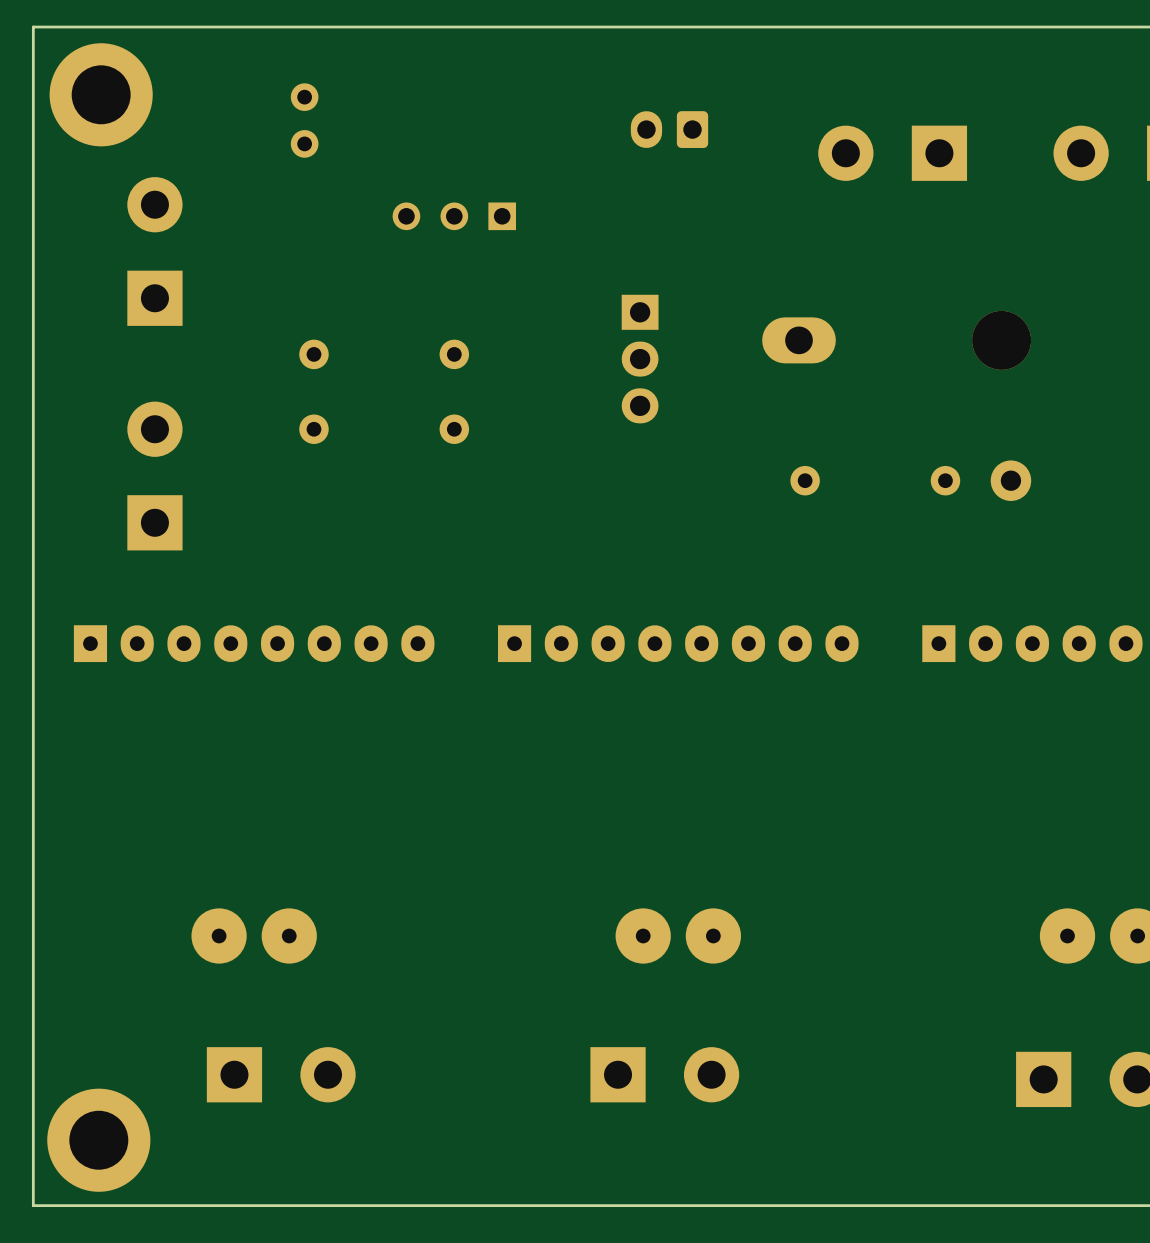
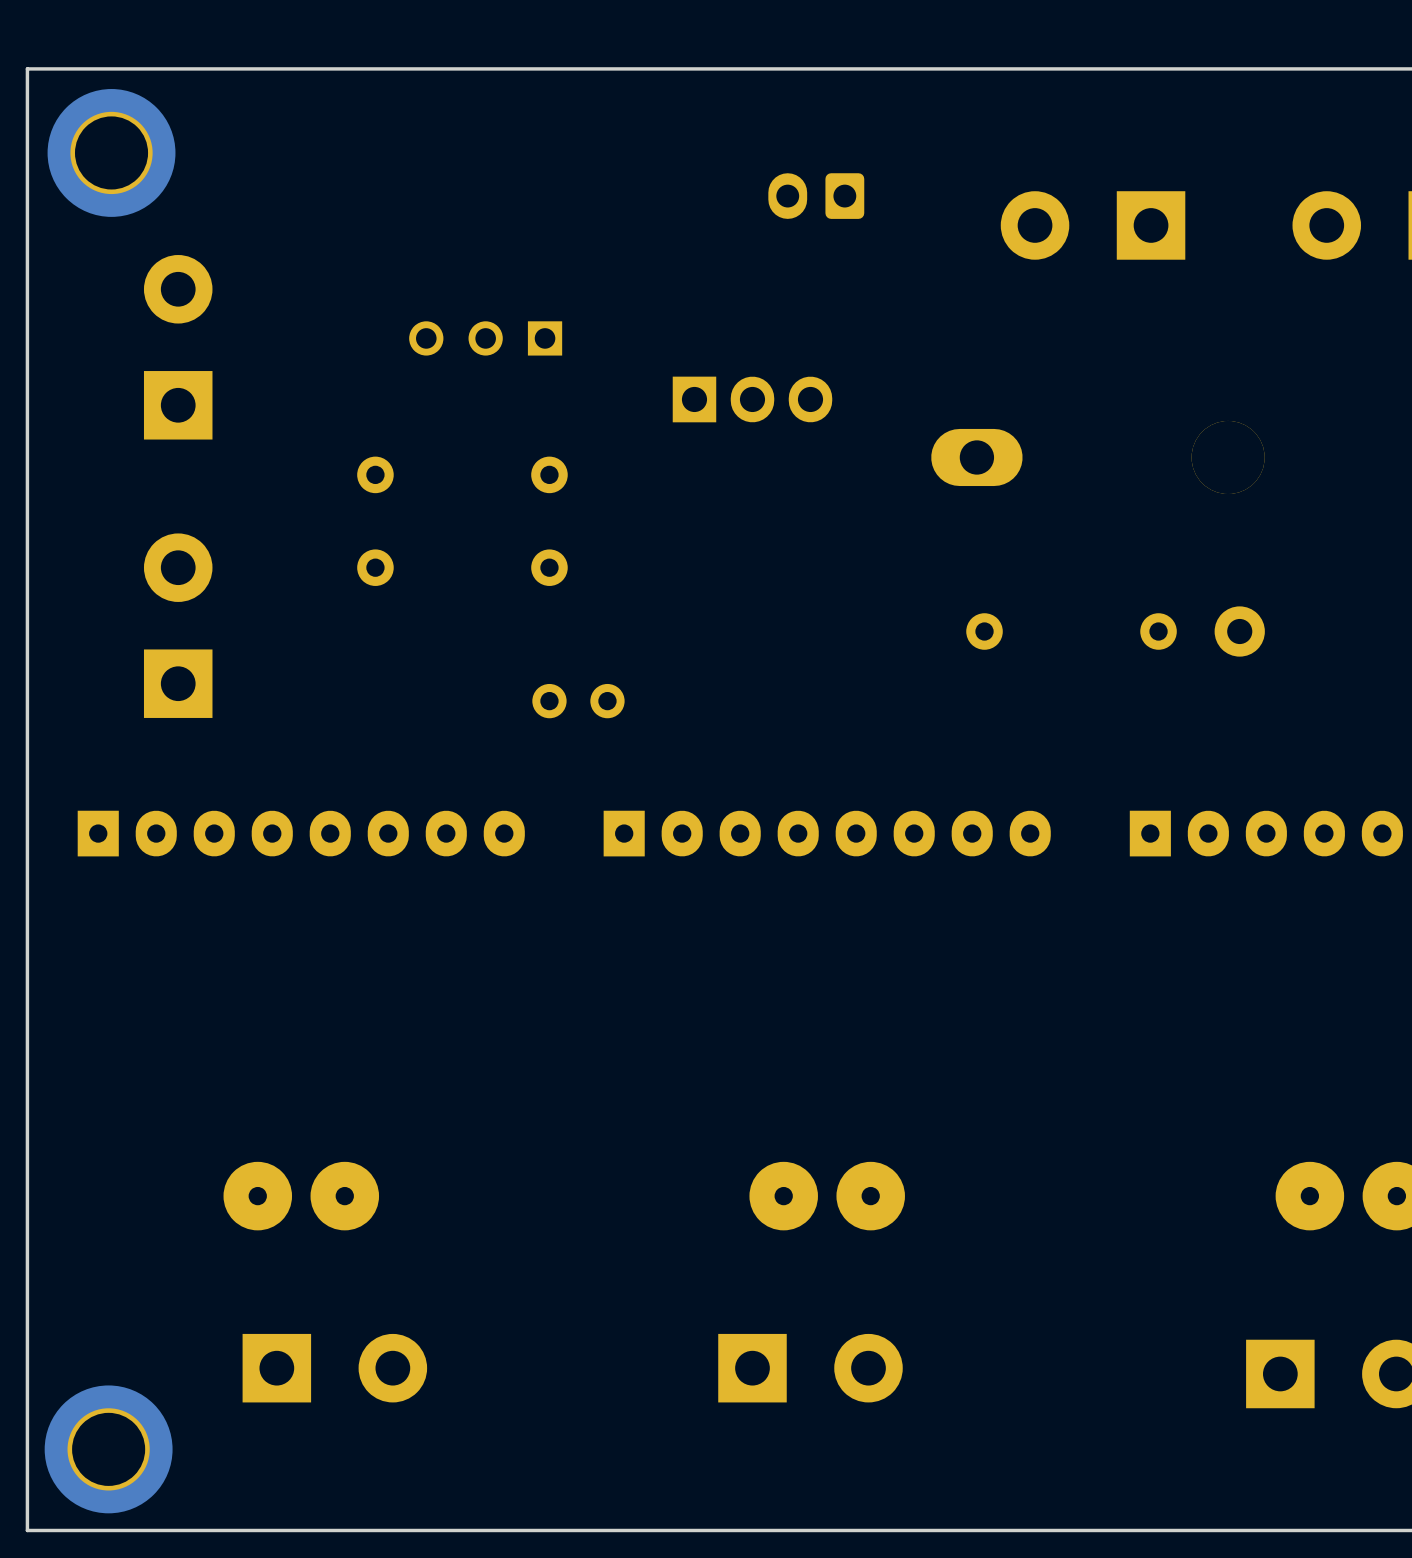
part rotation: 0° (304, 120) -> 90° clockwise (578, 701)
part position: (304, 120) -> (578, 701)
part position: (454, 216) -> (485, 338)
part rotation: 0° (640, 359) -> 90° counterclockwise (752, 399)

